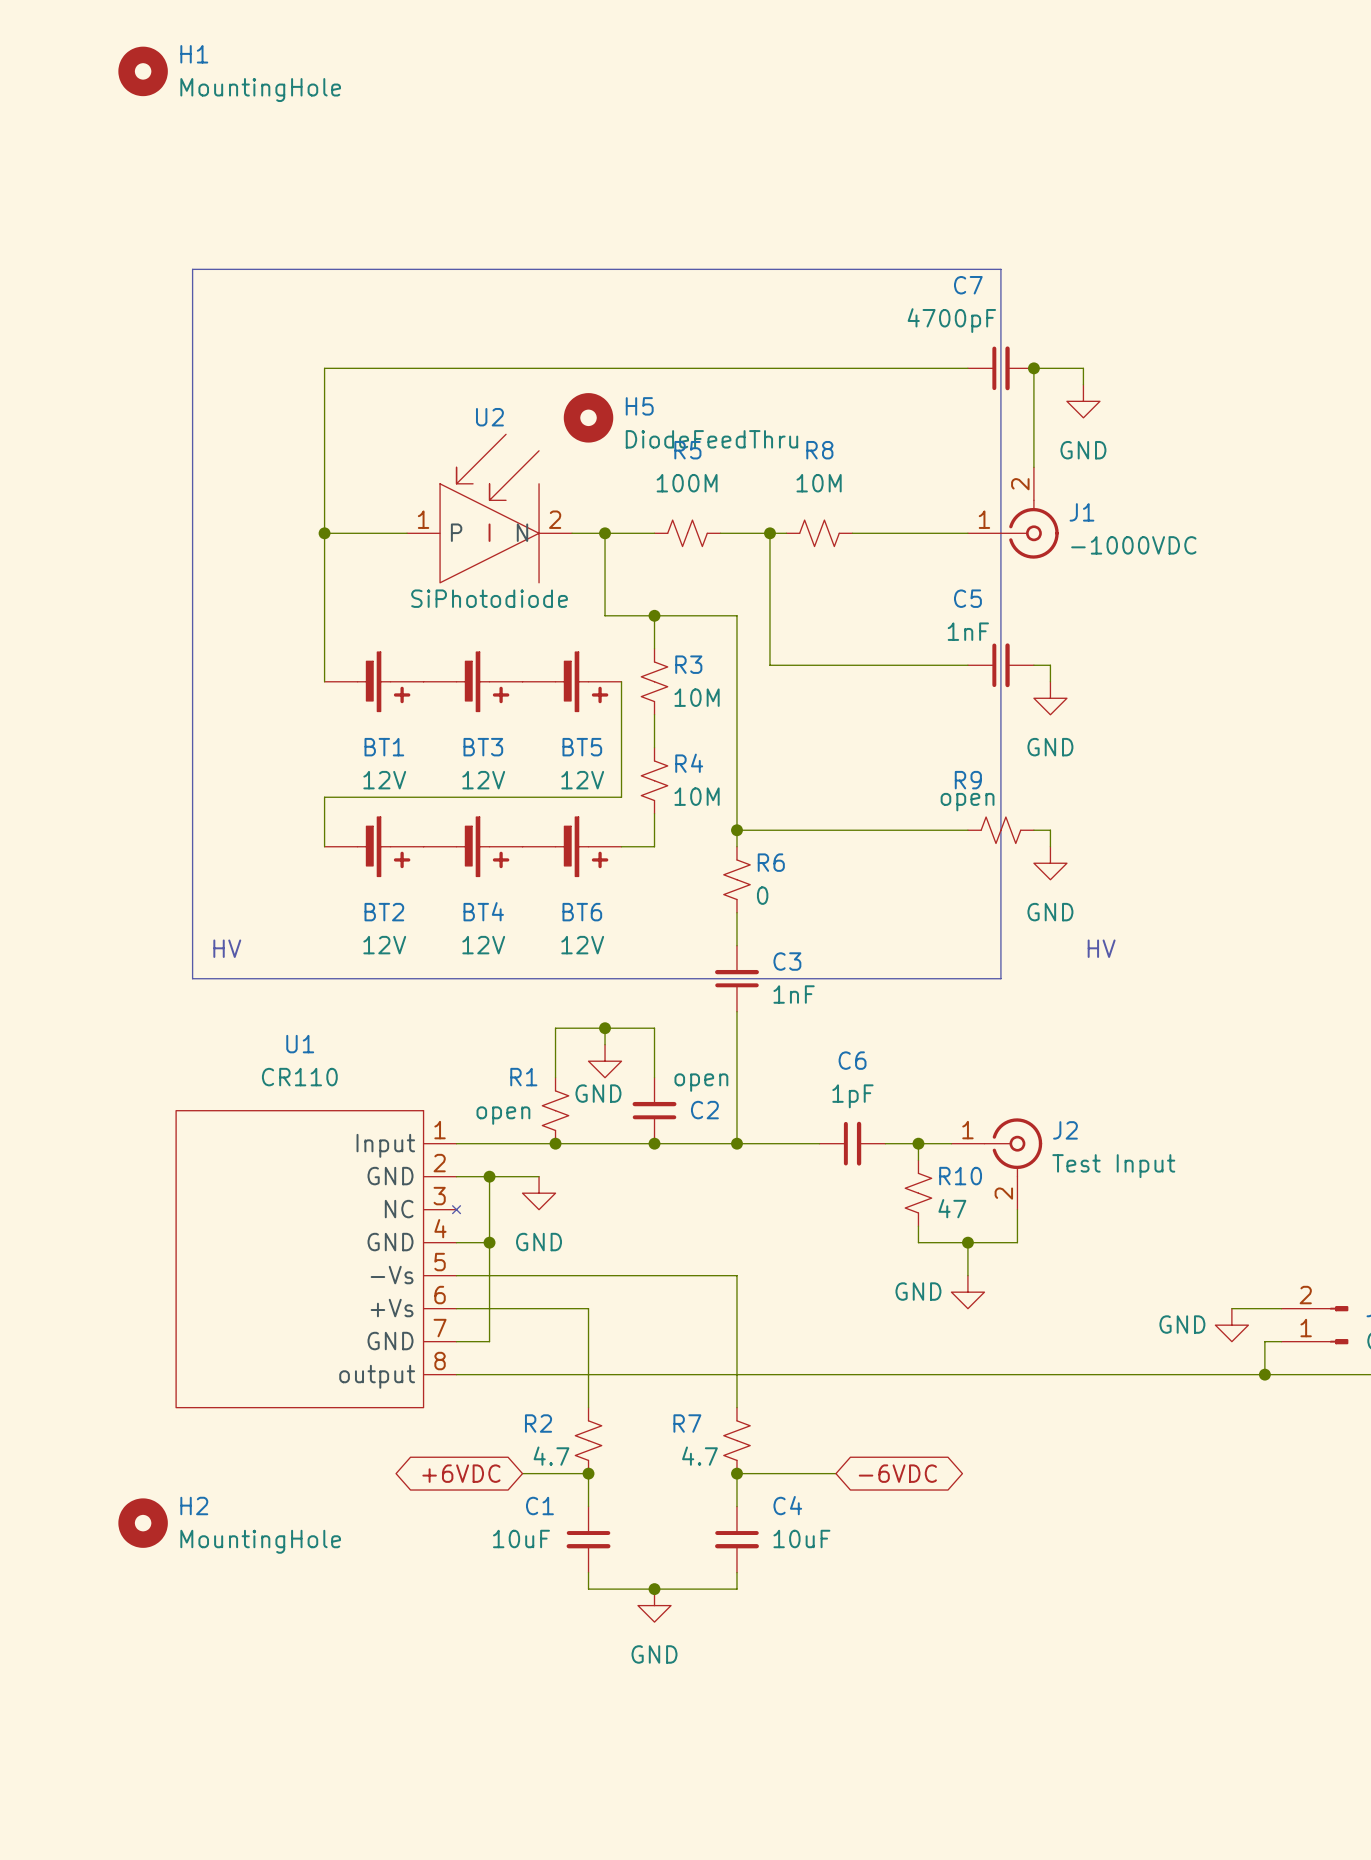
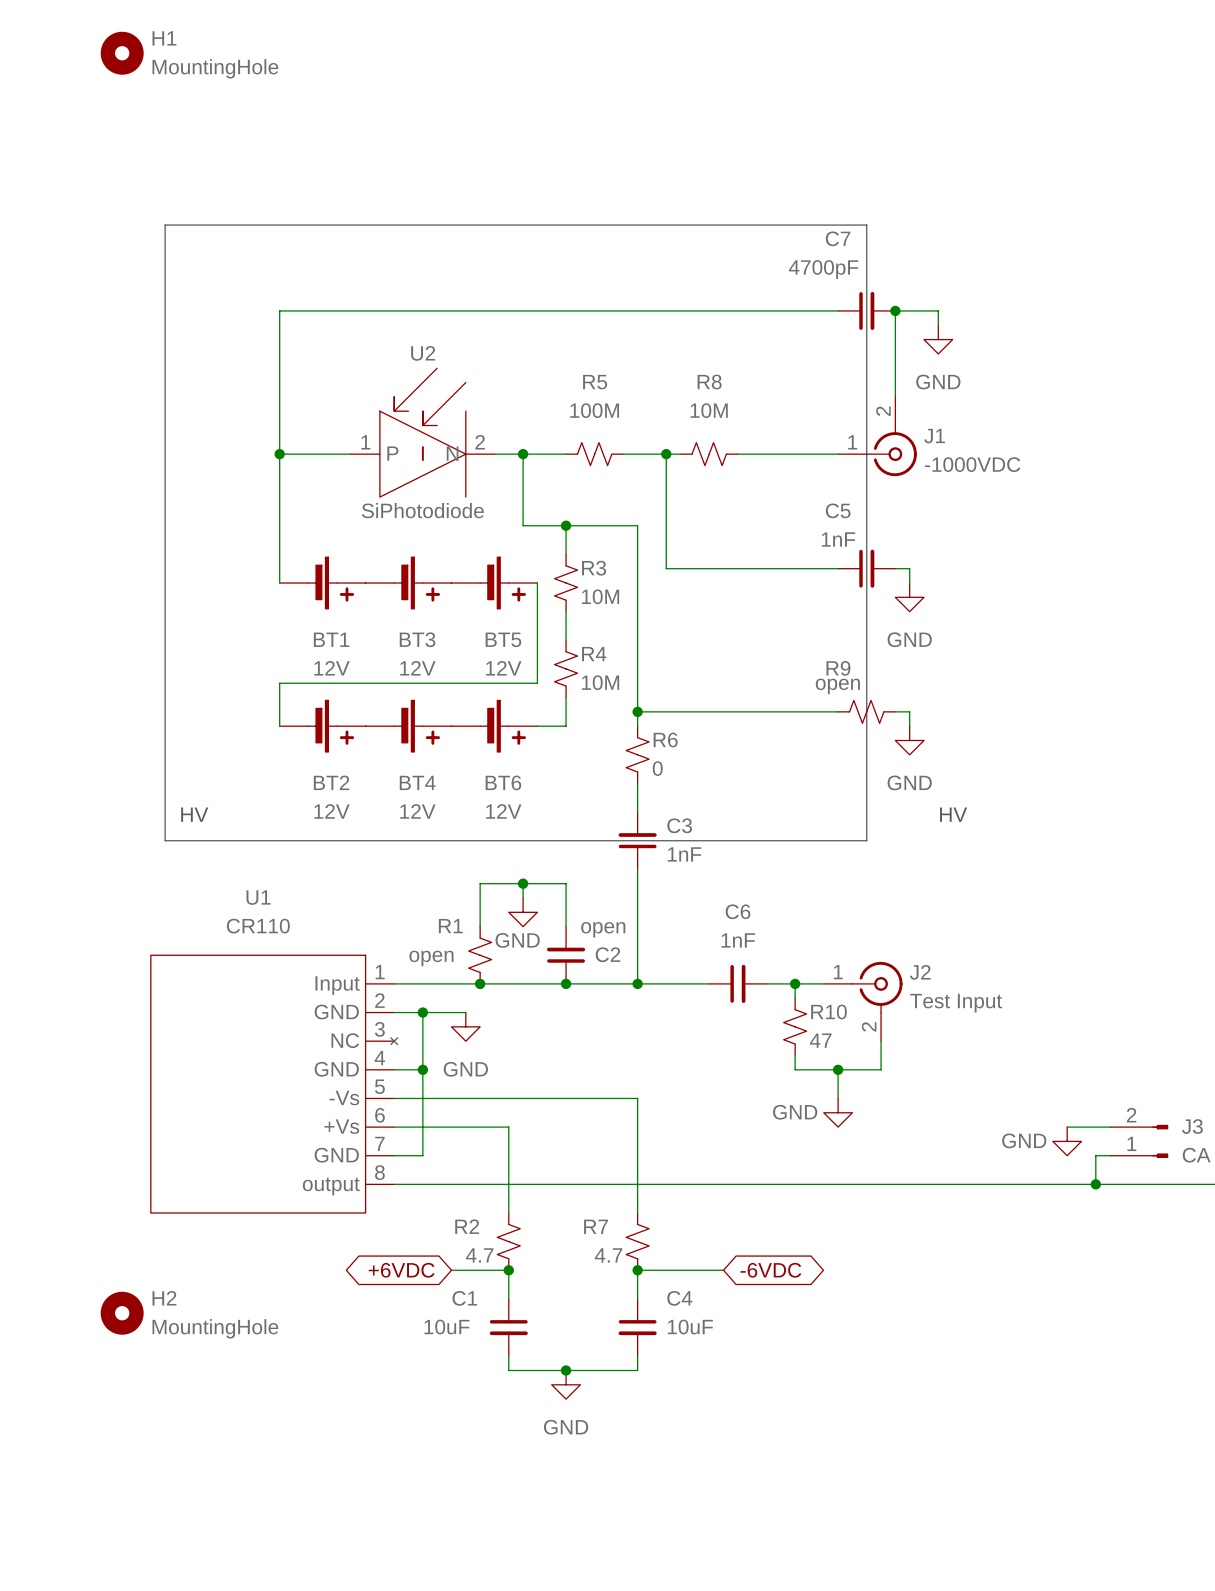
H5: DiodeFeedThru (588, 417) -> none
C6 value: 1pF (852, 1096) -> 1nF (738, 940)

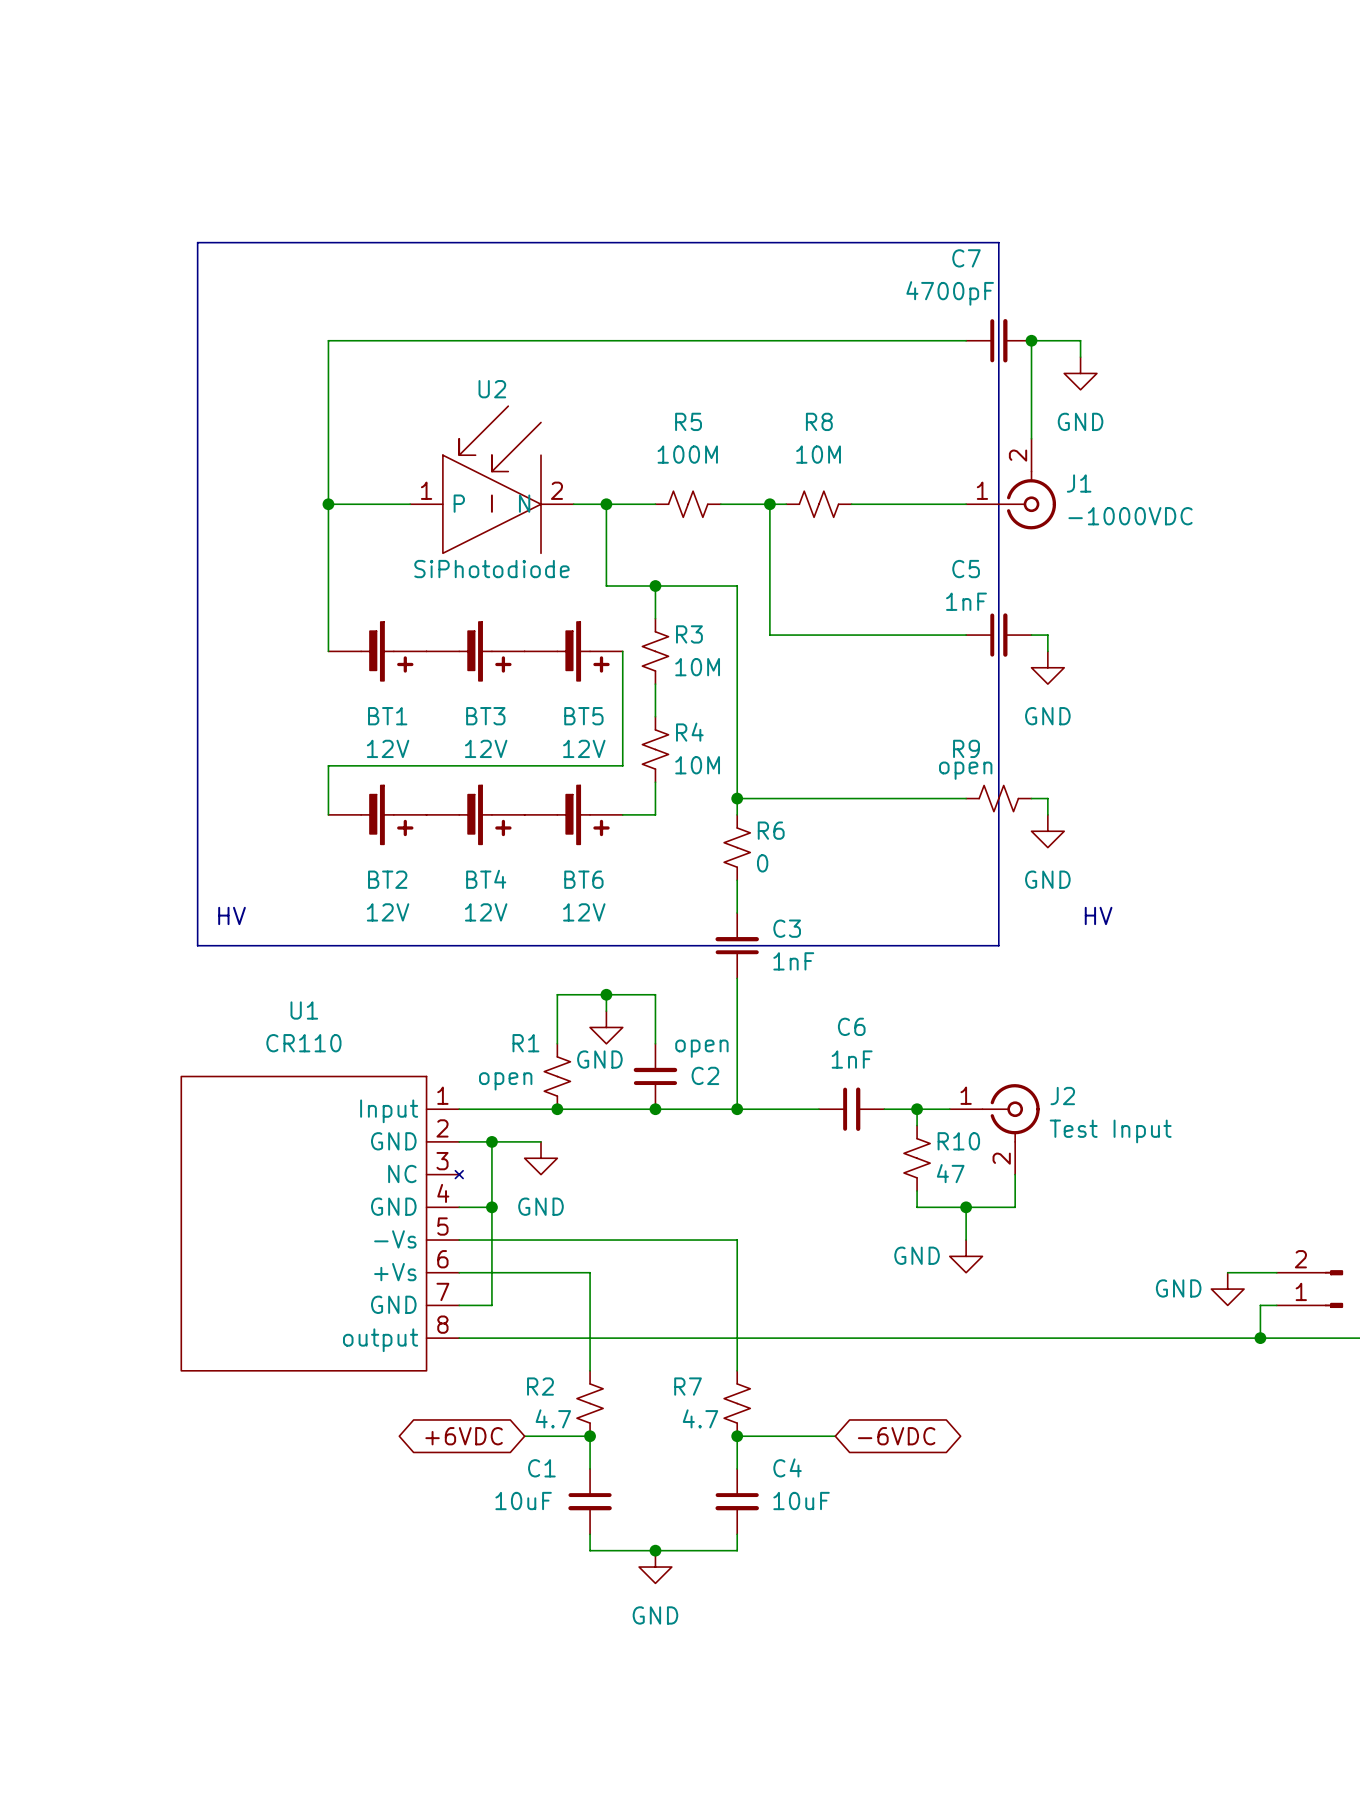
H1: MountingHole (122, 53) -> none
H2: MountingHole (122, 1313) -> none

